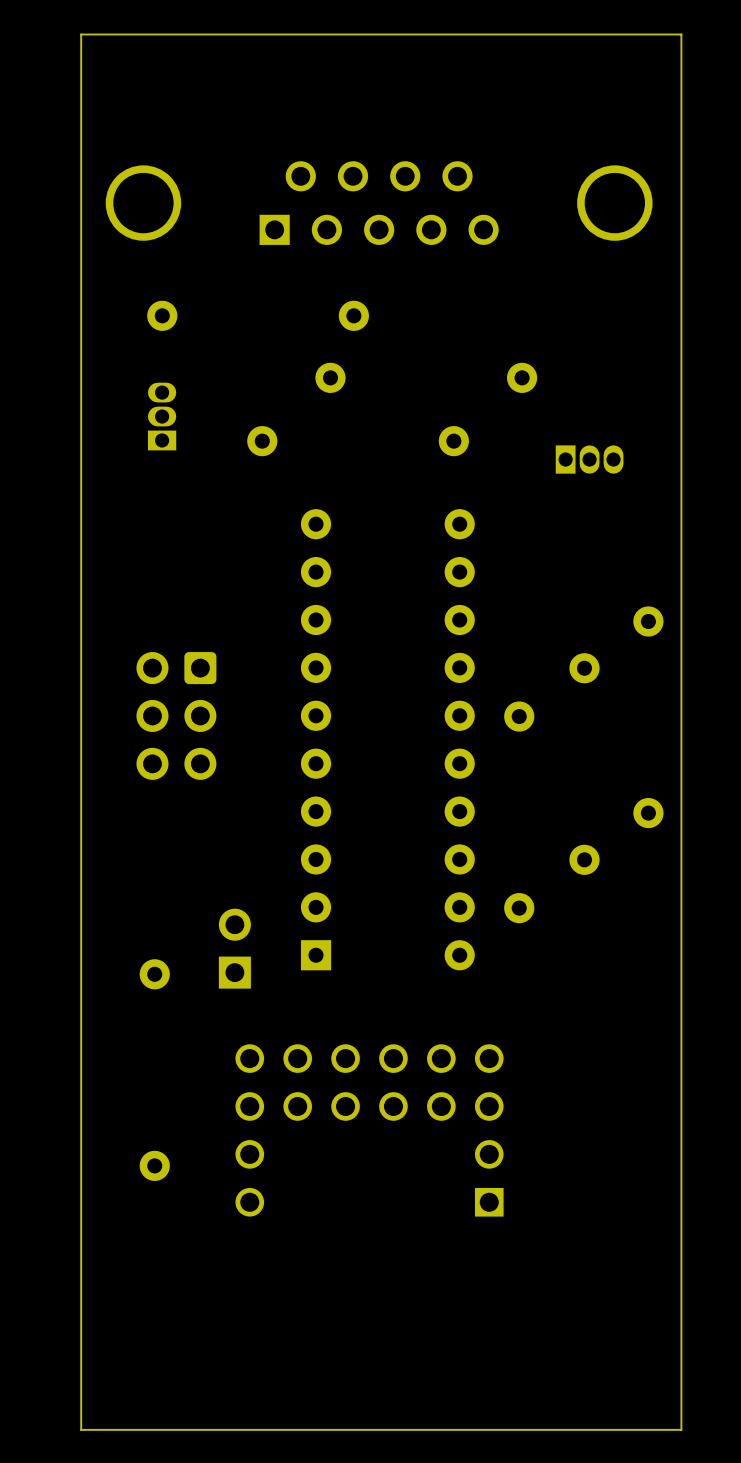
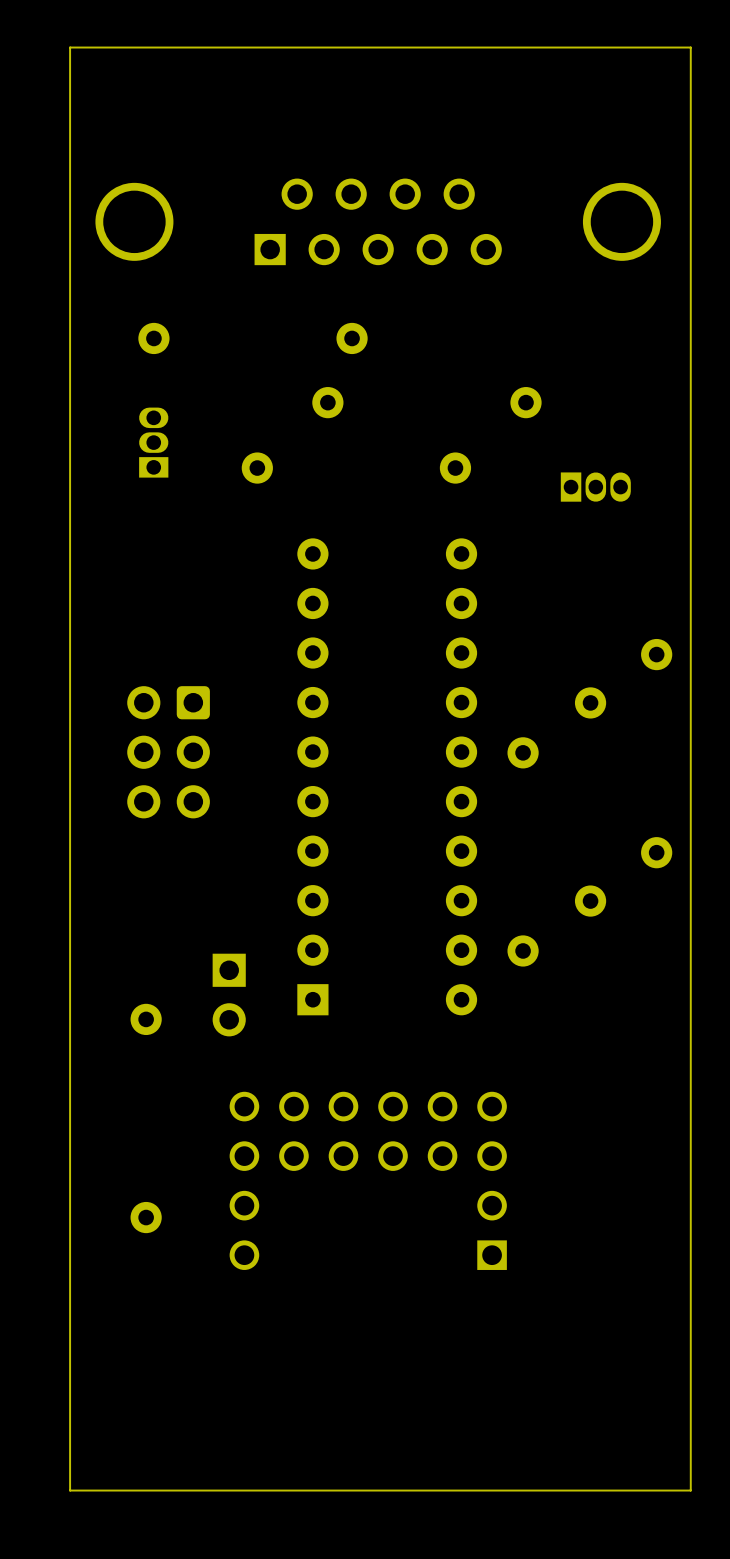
part rotation: 0° (234, 948) -> 180° (229, 995)

